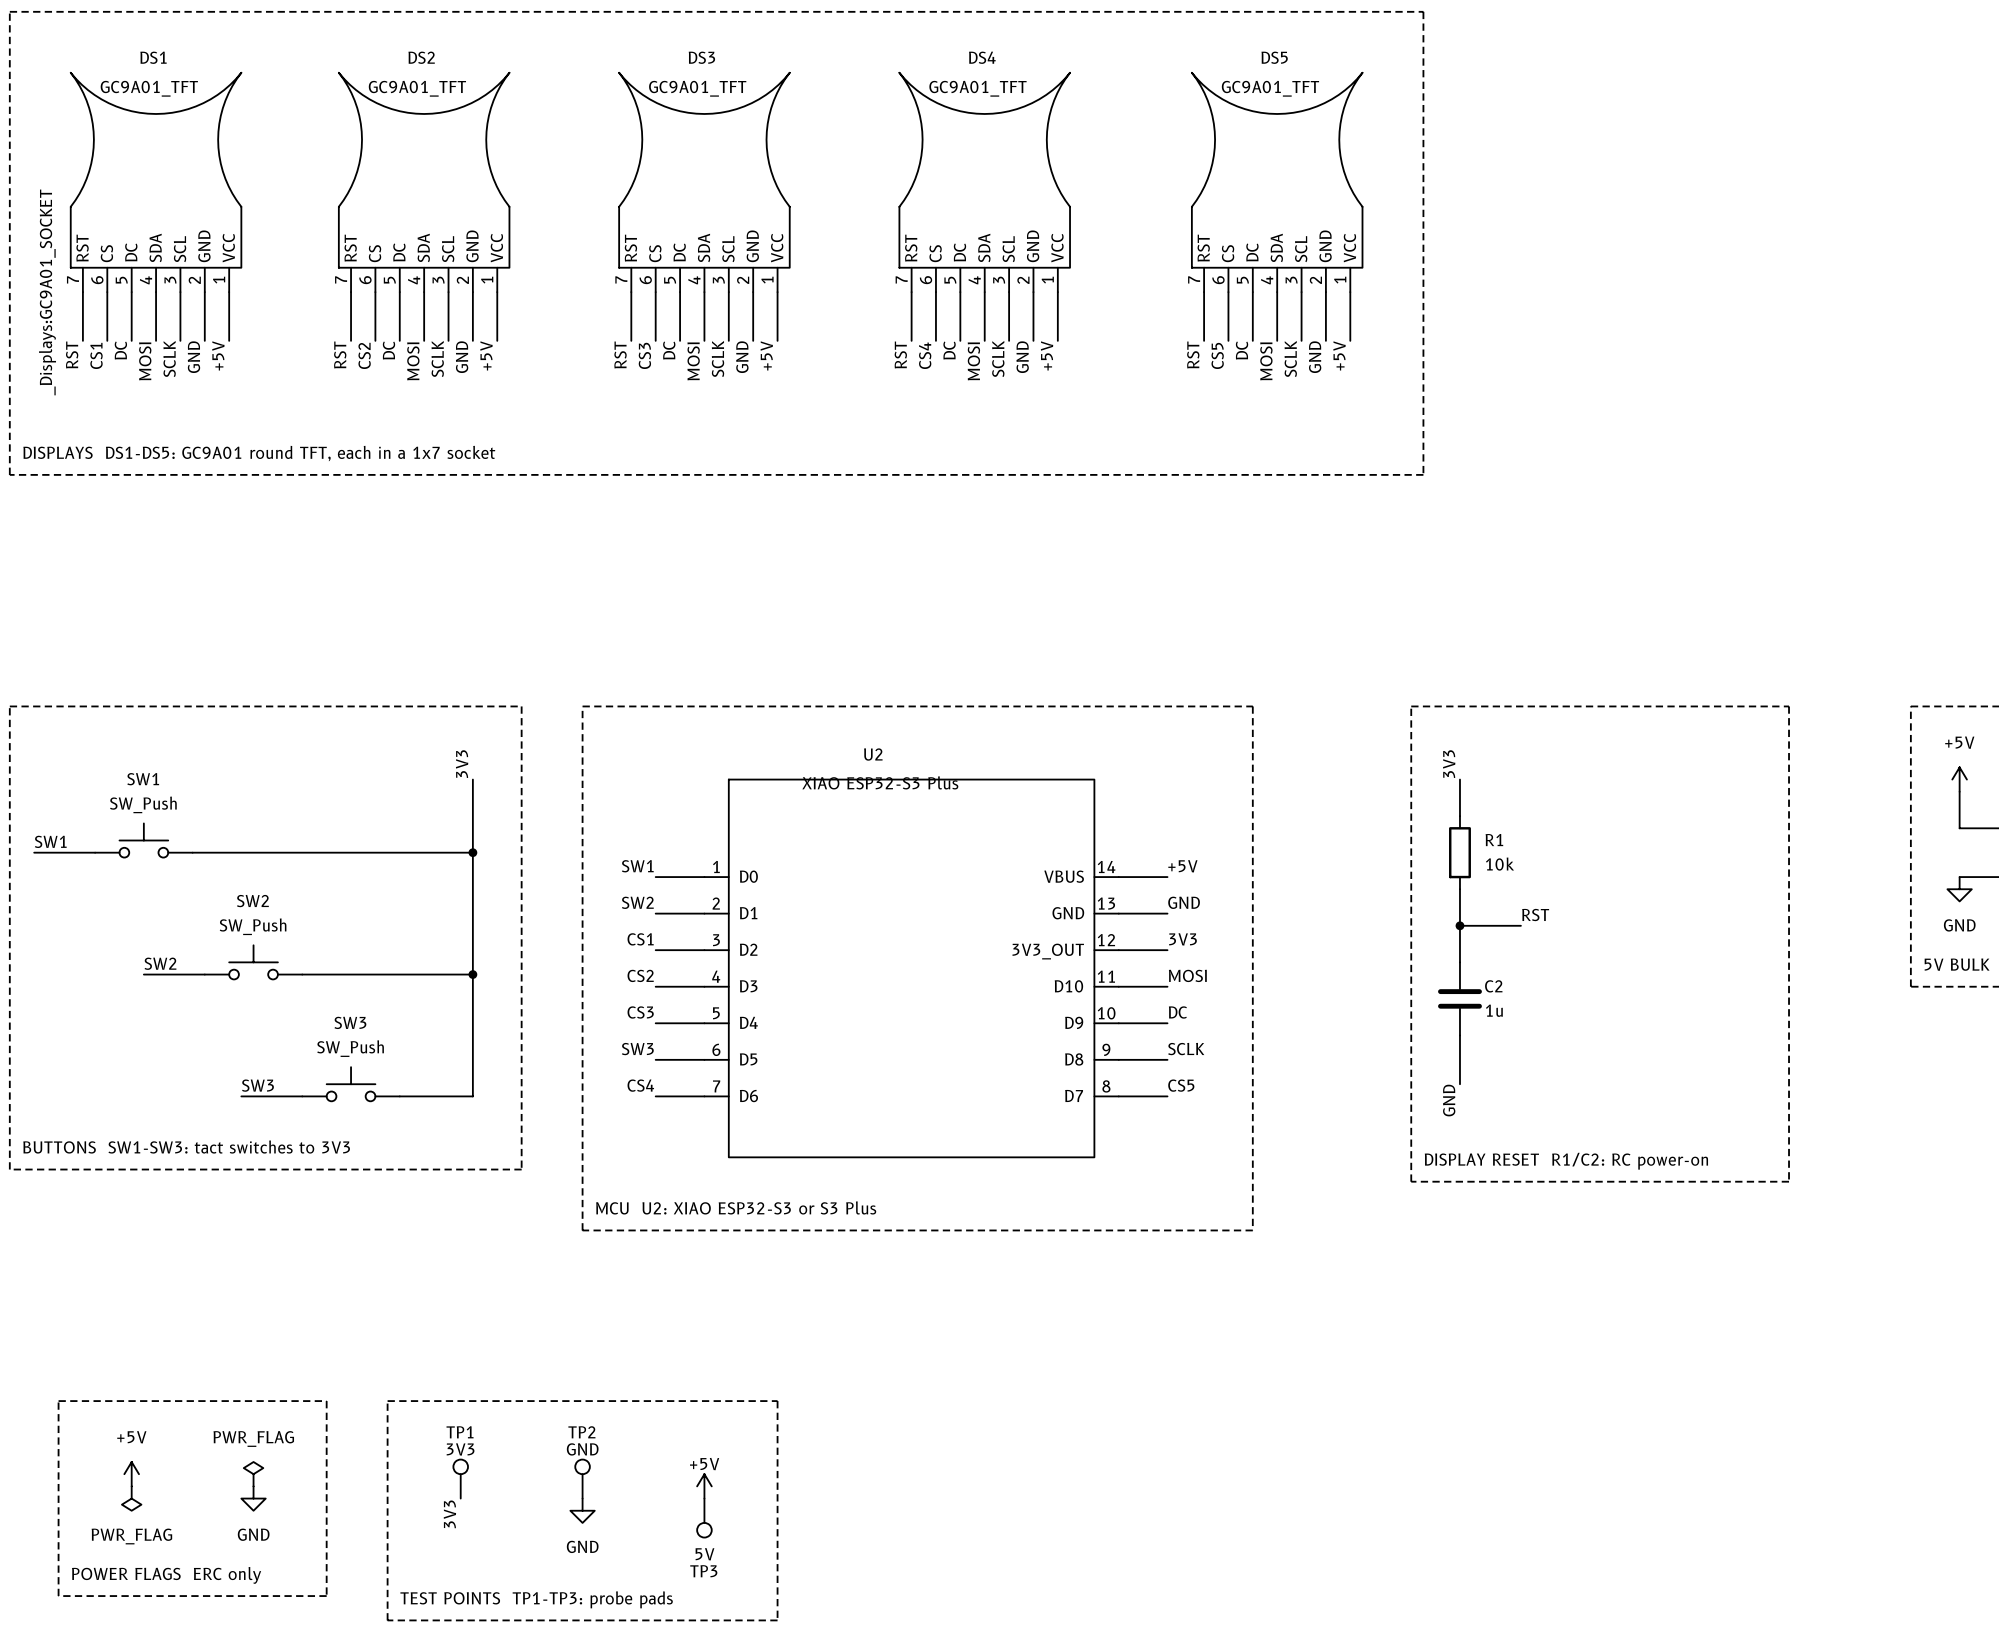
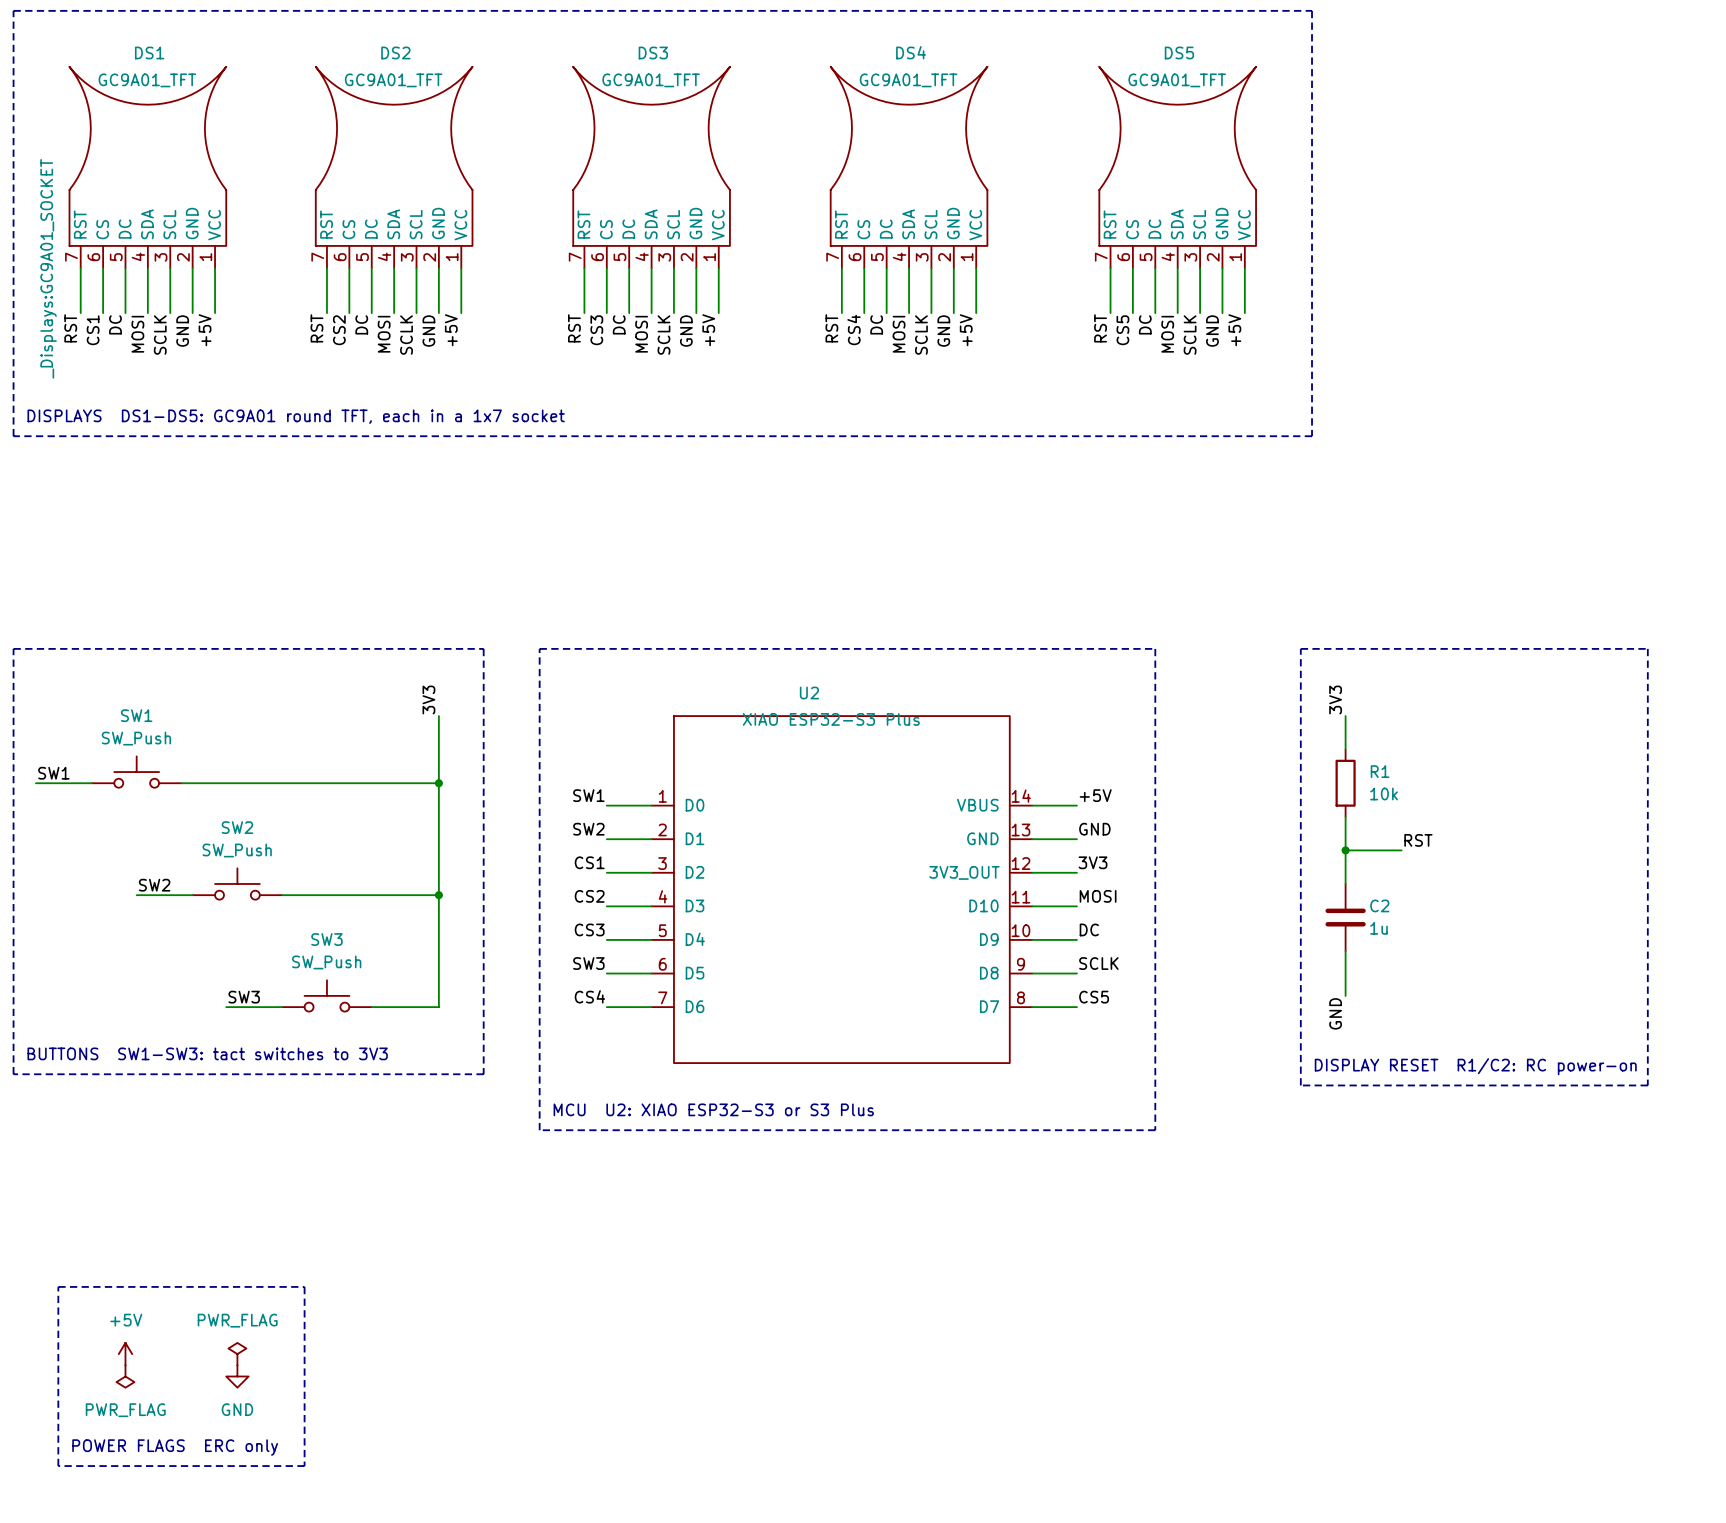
line: (387, 1401) (777, 1401) (777, 1620) (387, 1620) (387, 1401) -> none
TP1: 3V3 (460, 1479) -> none
TP2: GND (582, 1479) -> none
power symbol: +5V (704, 1486) -> none
power symbol: GND (582, 1510) -> none
label: 3V3 (449, 1514) -> none
TP3: 5V (704, 1518) -> none
text: TEST POINTS TP1-TP3: probe pads (536, 1599) -> none

